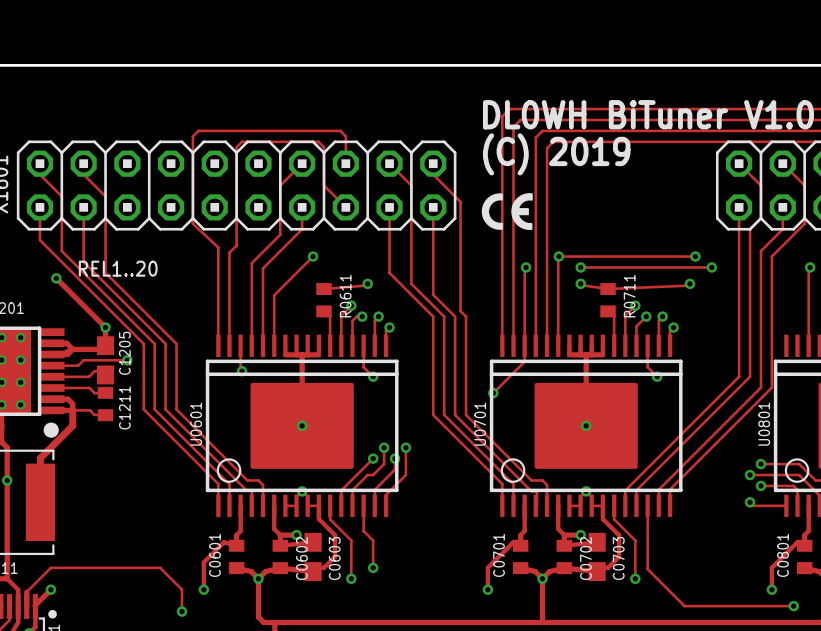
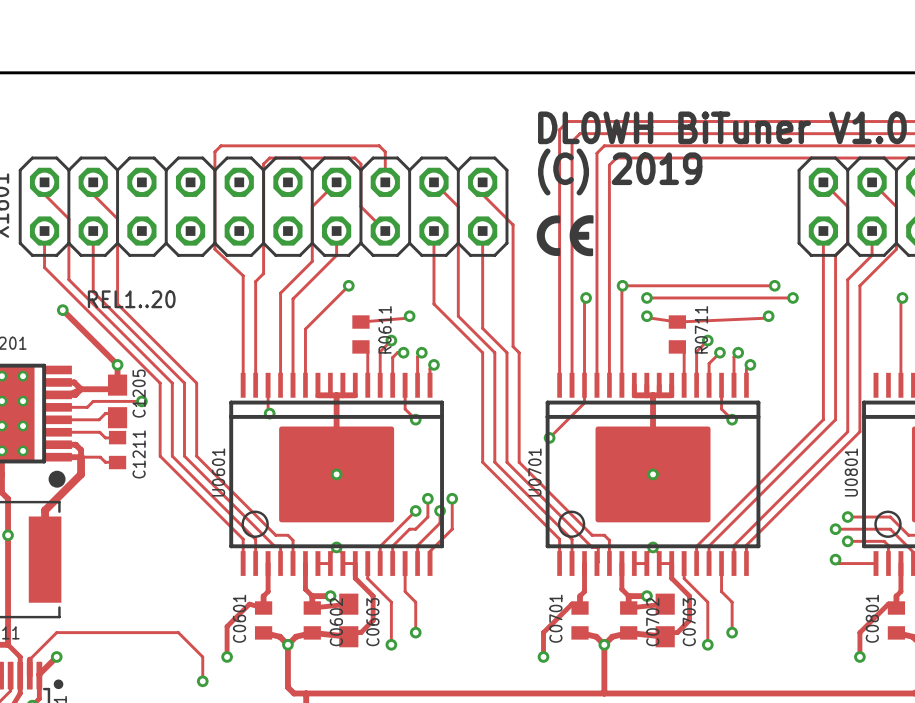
track: (647, 531) (647, 569) (684, 606) (793, 606) -> (721, 591) (732, 602) (732, 632)
via: none -> (732, 632)
via: (793, 606) -> none

